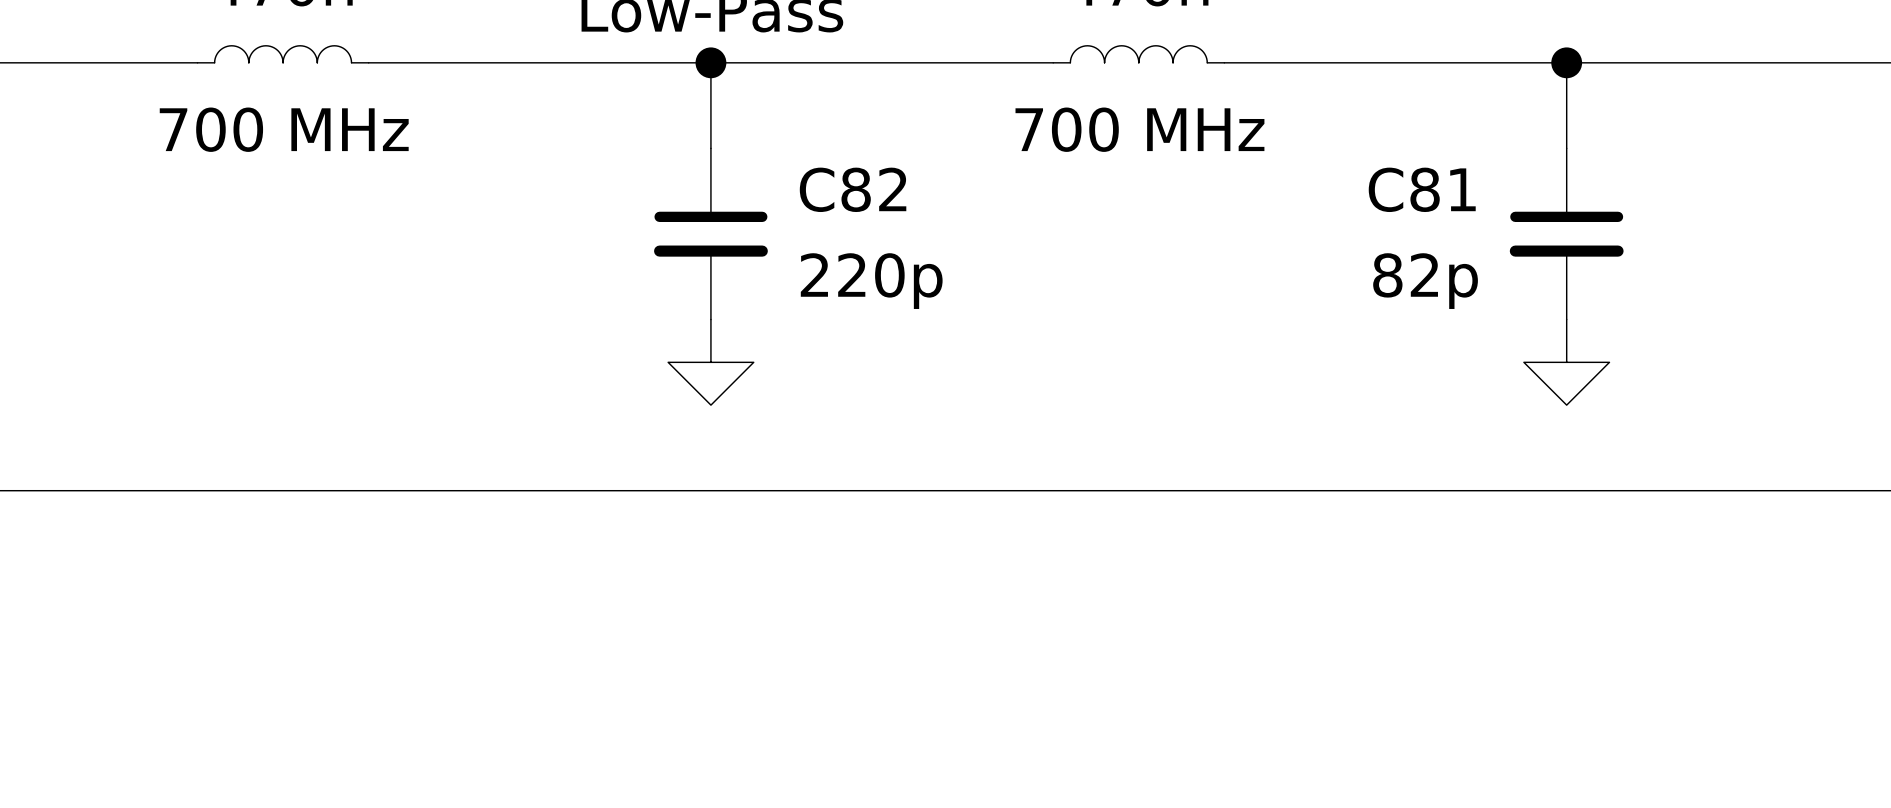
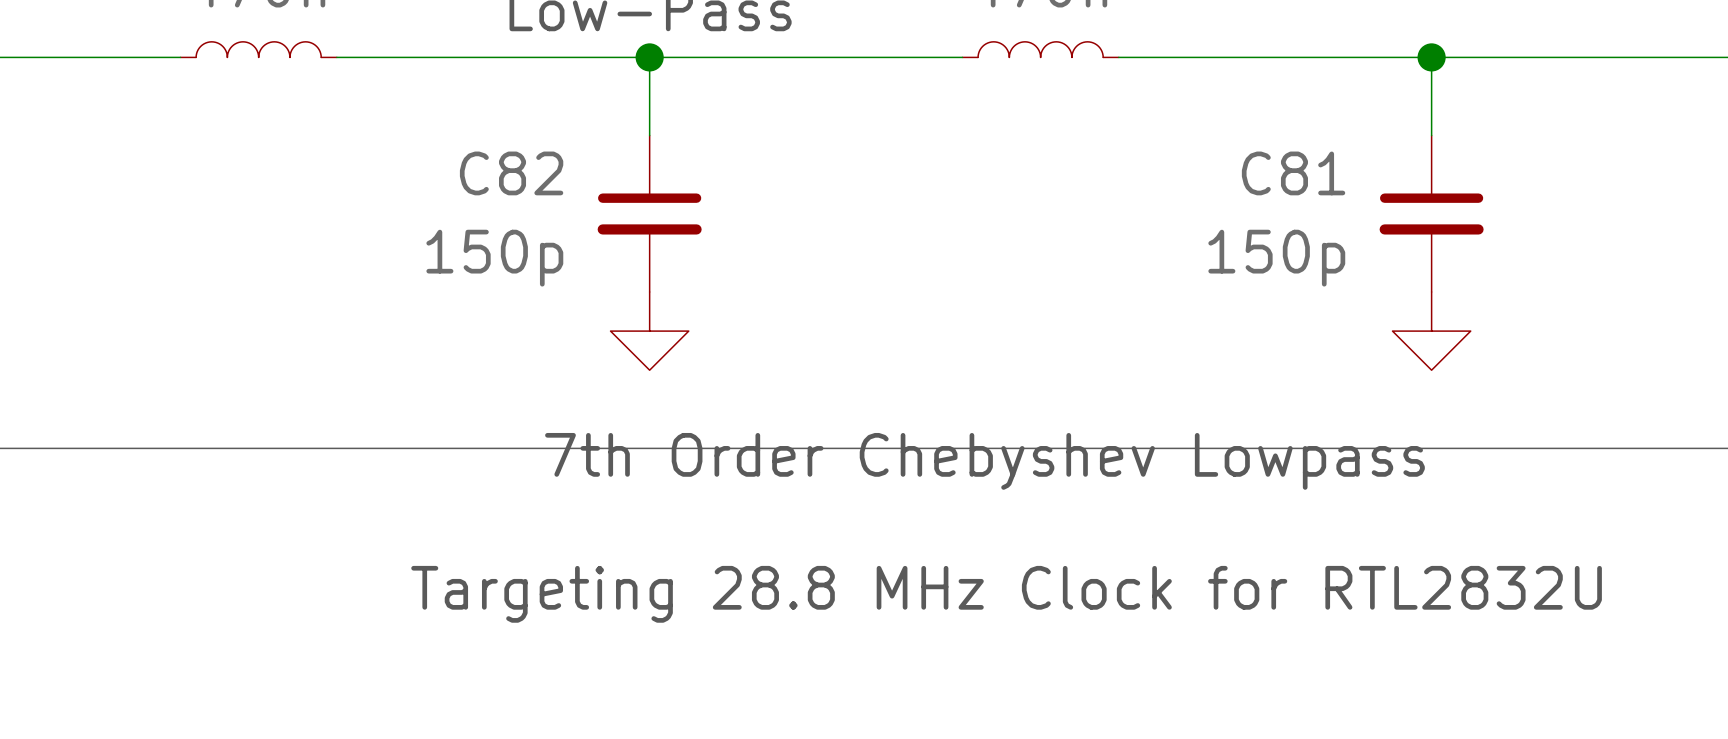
part text: 700 MHz (284, 129) -> none
part text: 700 MHz (1139, 129) -> none
C82 name position: C82 (853, 189) -> C82 (511, 173)
C82 value: 220p (871, 281) -> 150p (494, 258)
C81 value: 82p (1425, 281) -> 150p (1276, 258)
text: none -> 7th Order Chebyshev Lowpass (984, 461)
text: none -> Targeting 28.8 MHz Clock for RTL2832U (1006, 594)

